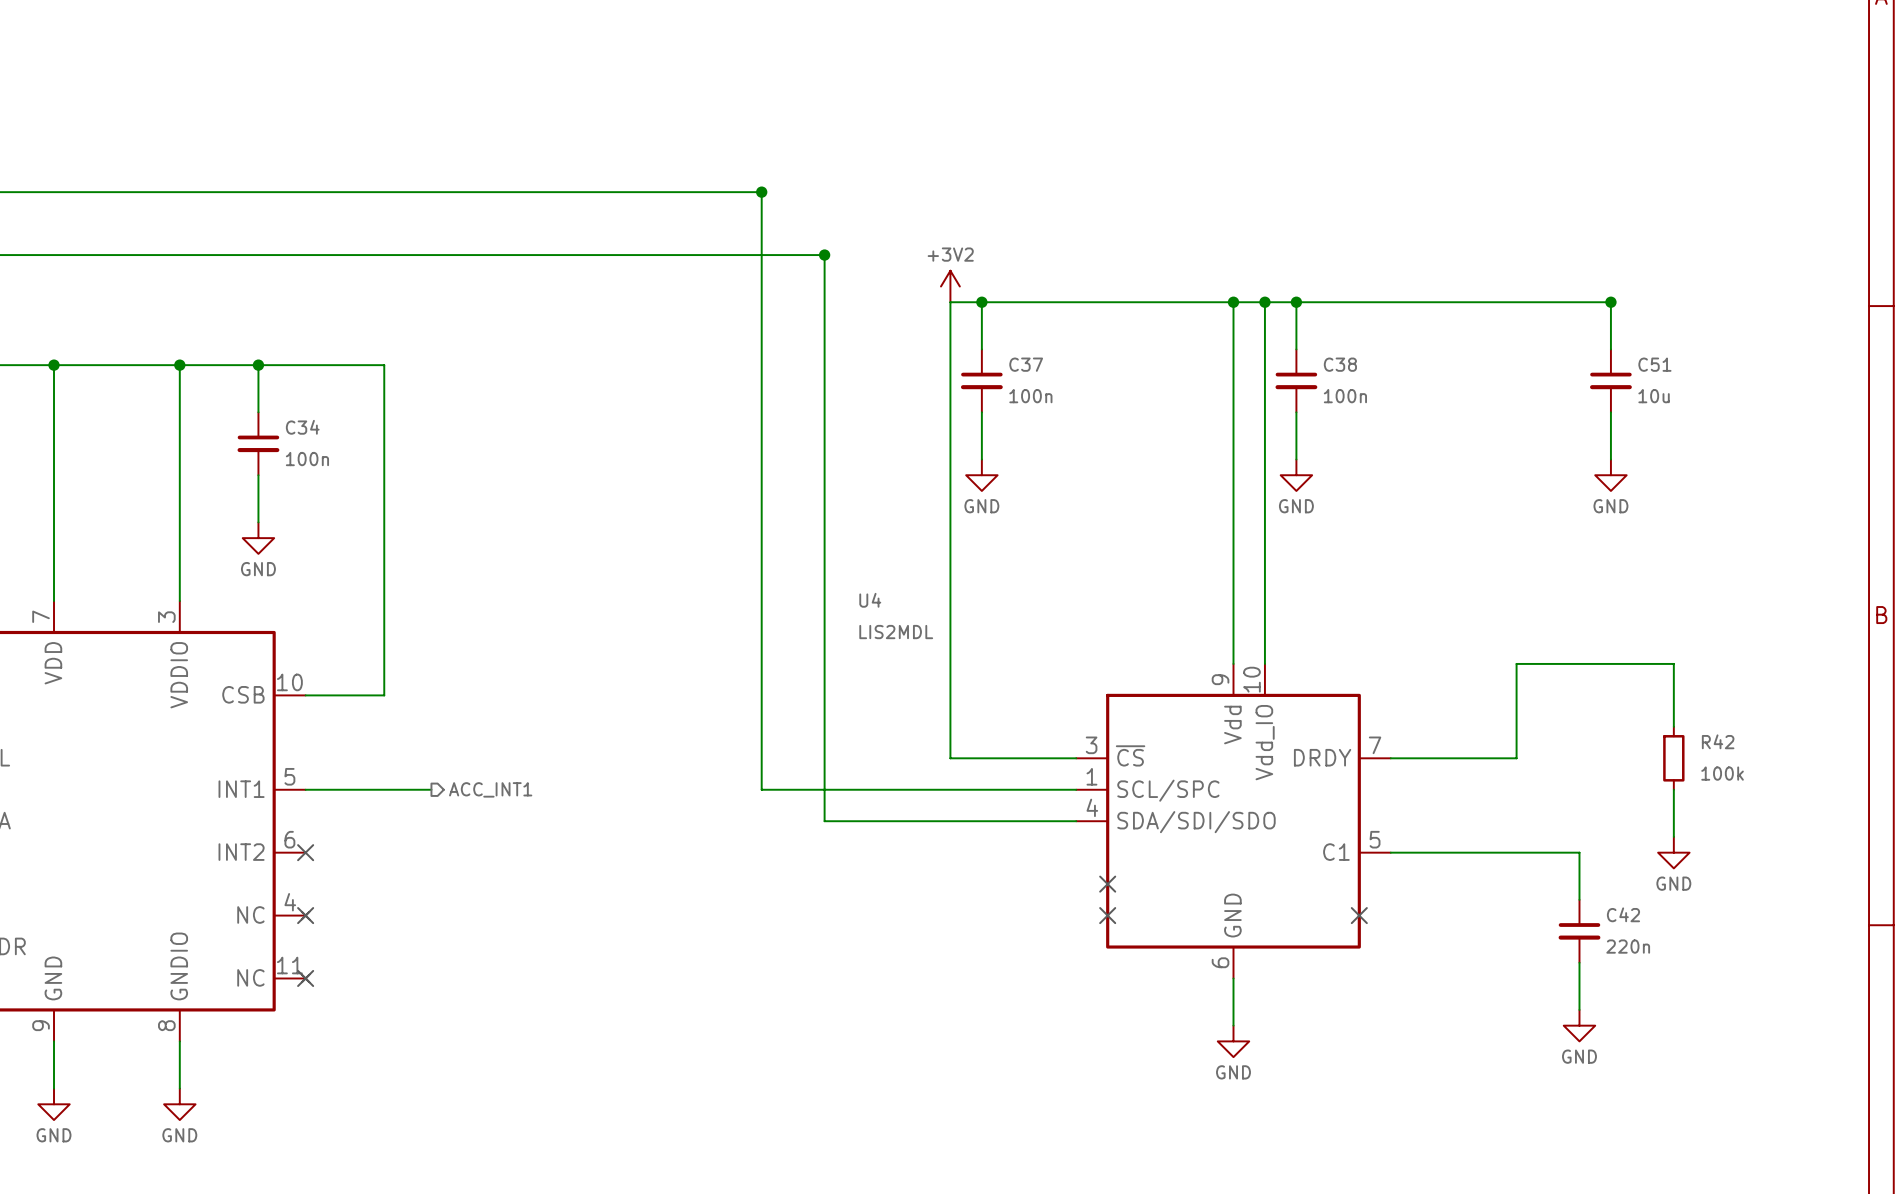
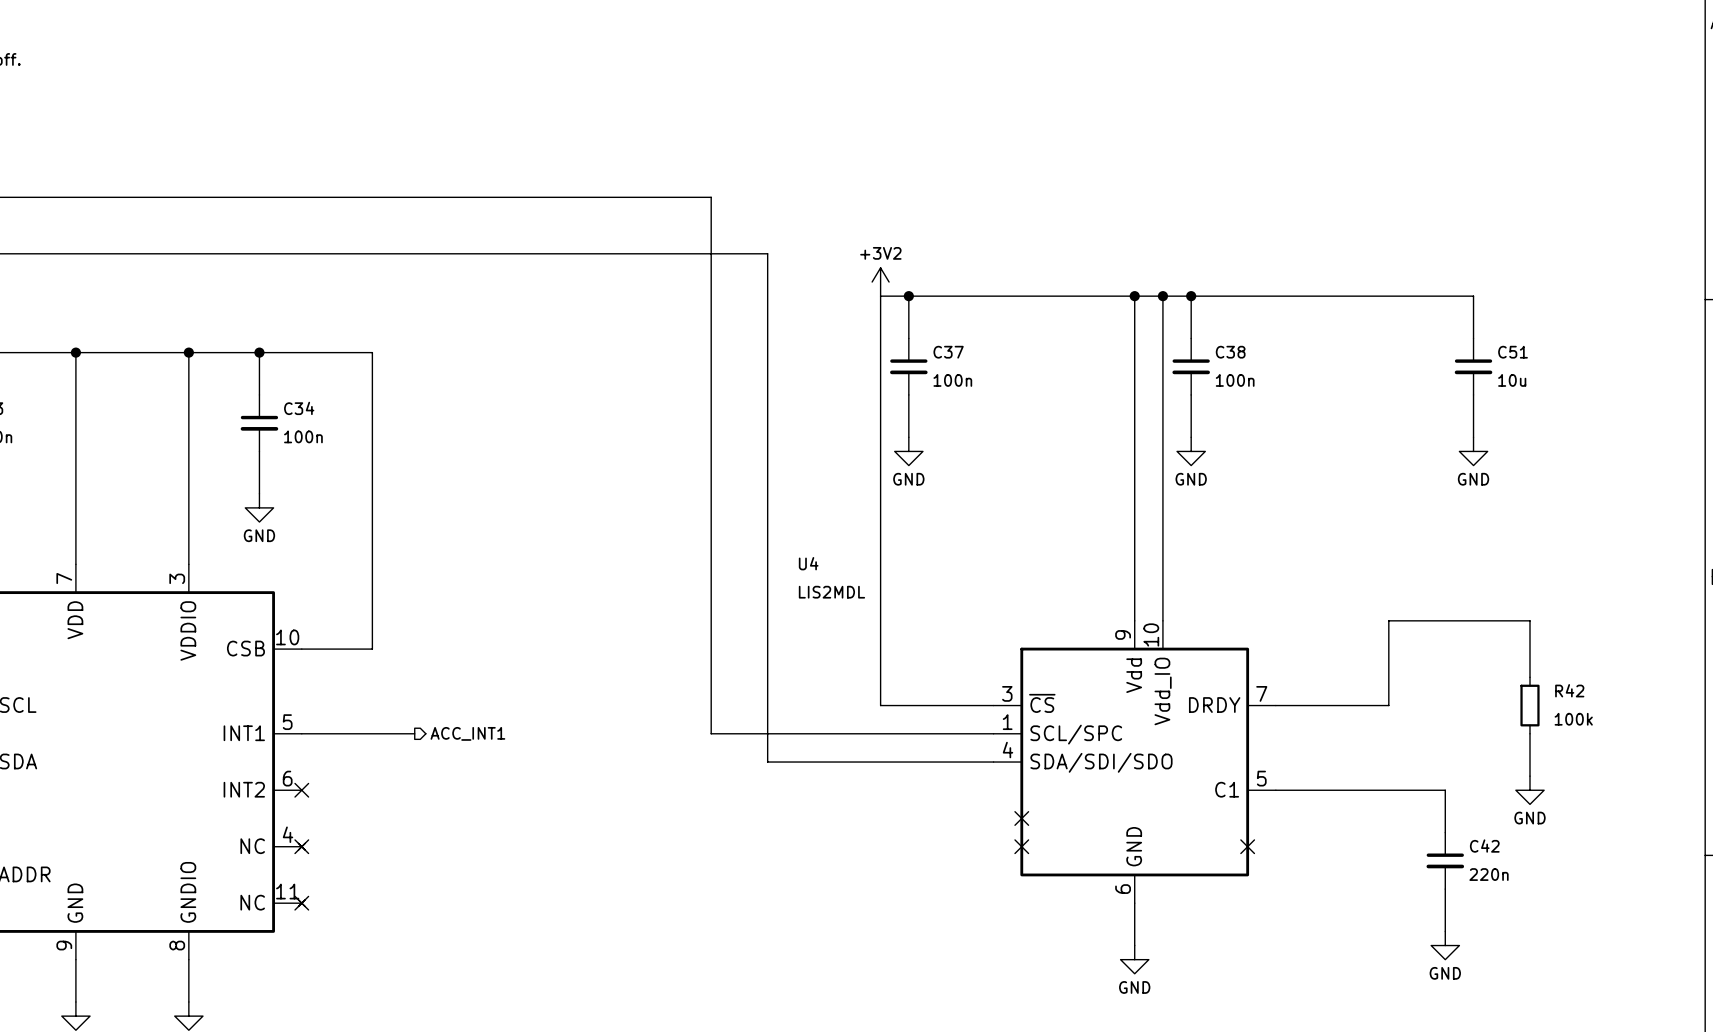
junction: (761, 192) -> none
junction: (824, 255) -> none
junction: (1610, 302) -> none

